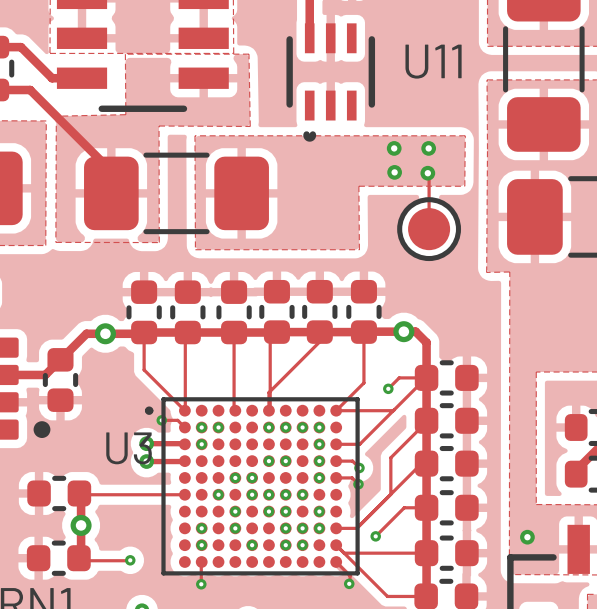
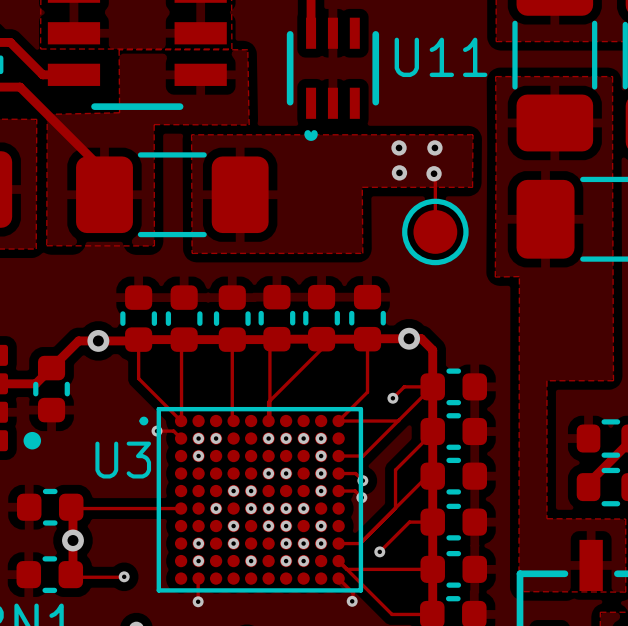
track: (146, 443) (184, 444) -> none
via: (146, 443) -> none
track: (146, 461) (184, 461) -> none
via: (146, 461) -> none
via: (527, 537) -> none

